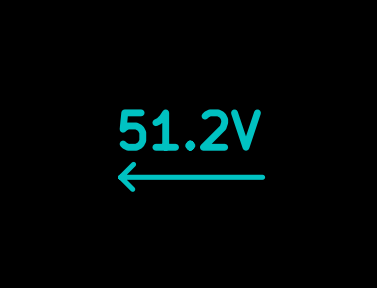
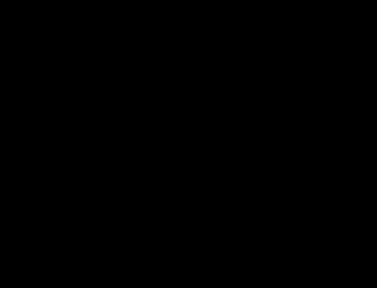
text: 51.2V (190, 130) -> none
line: (133, 164) (120, 177) -> none
line: (120, 177) (262, 177) -> none
line: (120, 177) (132, 189) -> none

